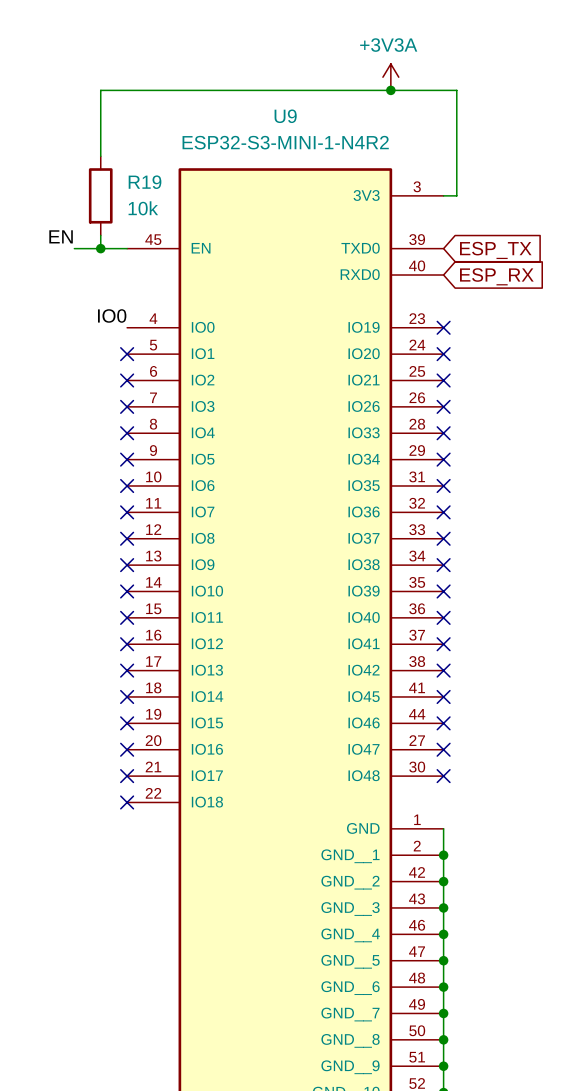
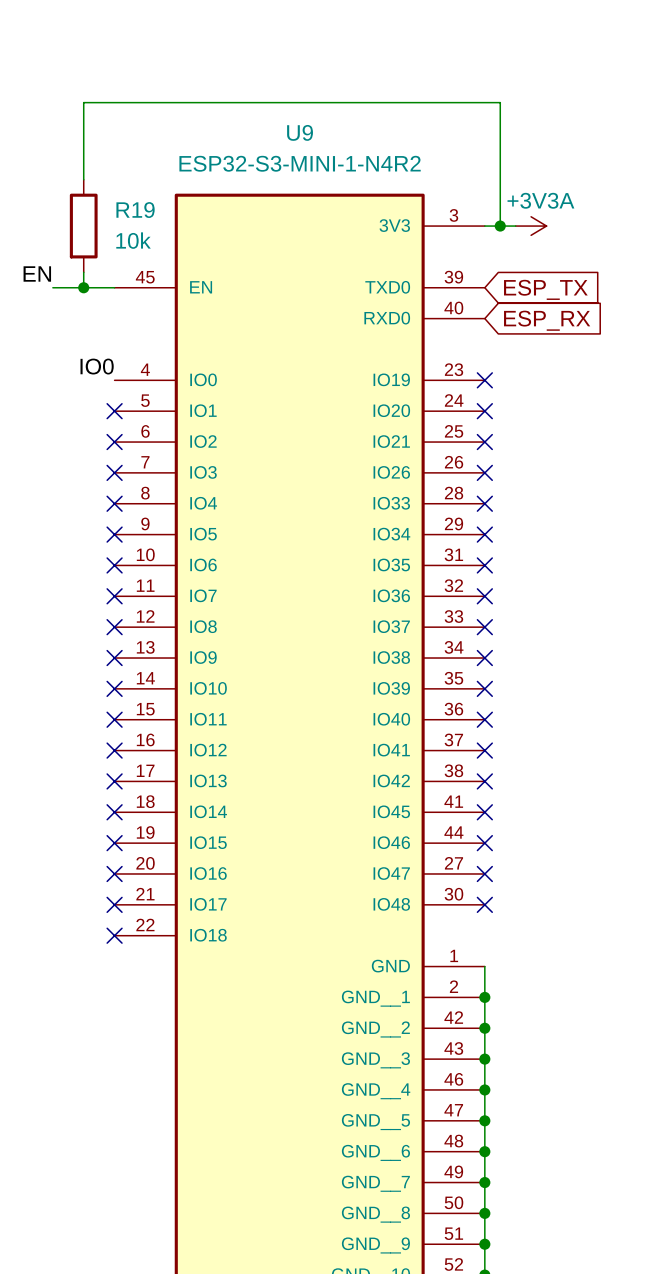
power symbol rotation: 0° (390, 77) -> 90° clockwise (531, 226)
power symbol position: +3V3A (390, 77) -> +3V3A (531, 226)
junction: (390, 90) -> none
wire: none -> (500, 226) (515, 226)
junction: none -> (500, 226)

